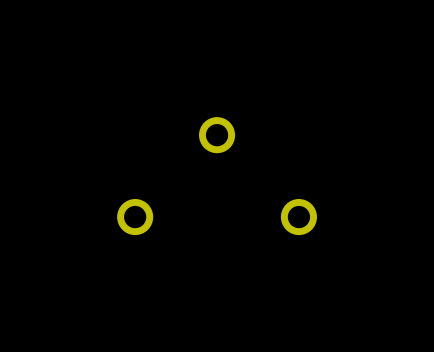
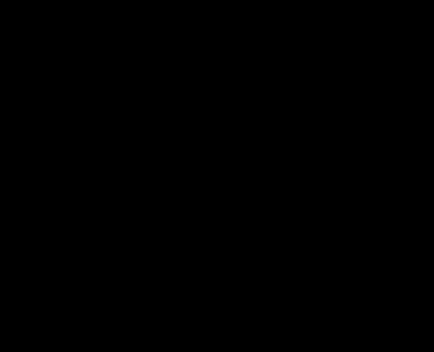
part: (217, 176) -> none

